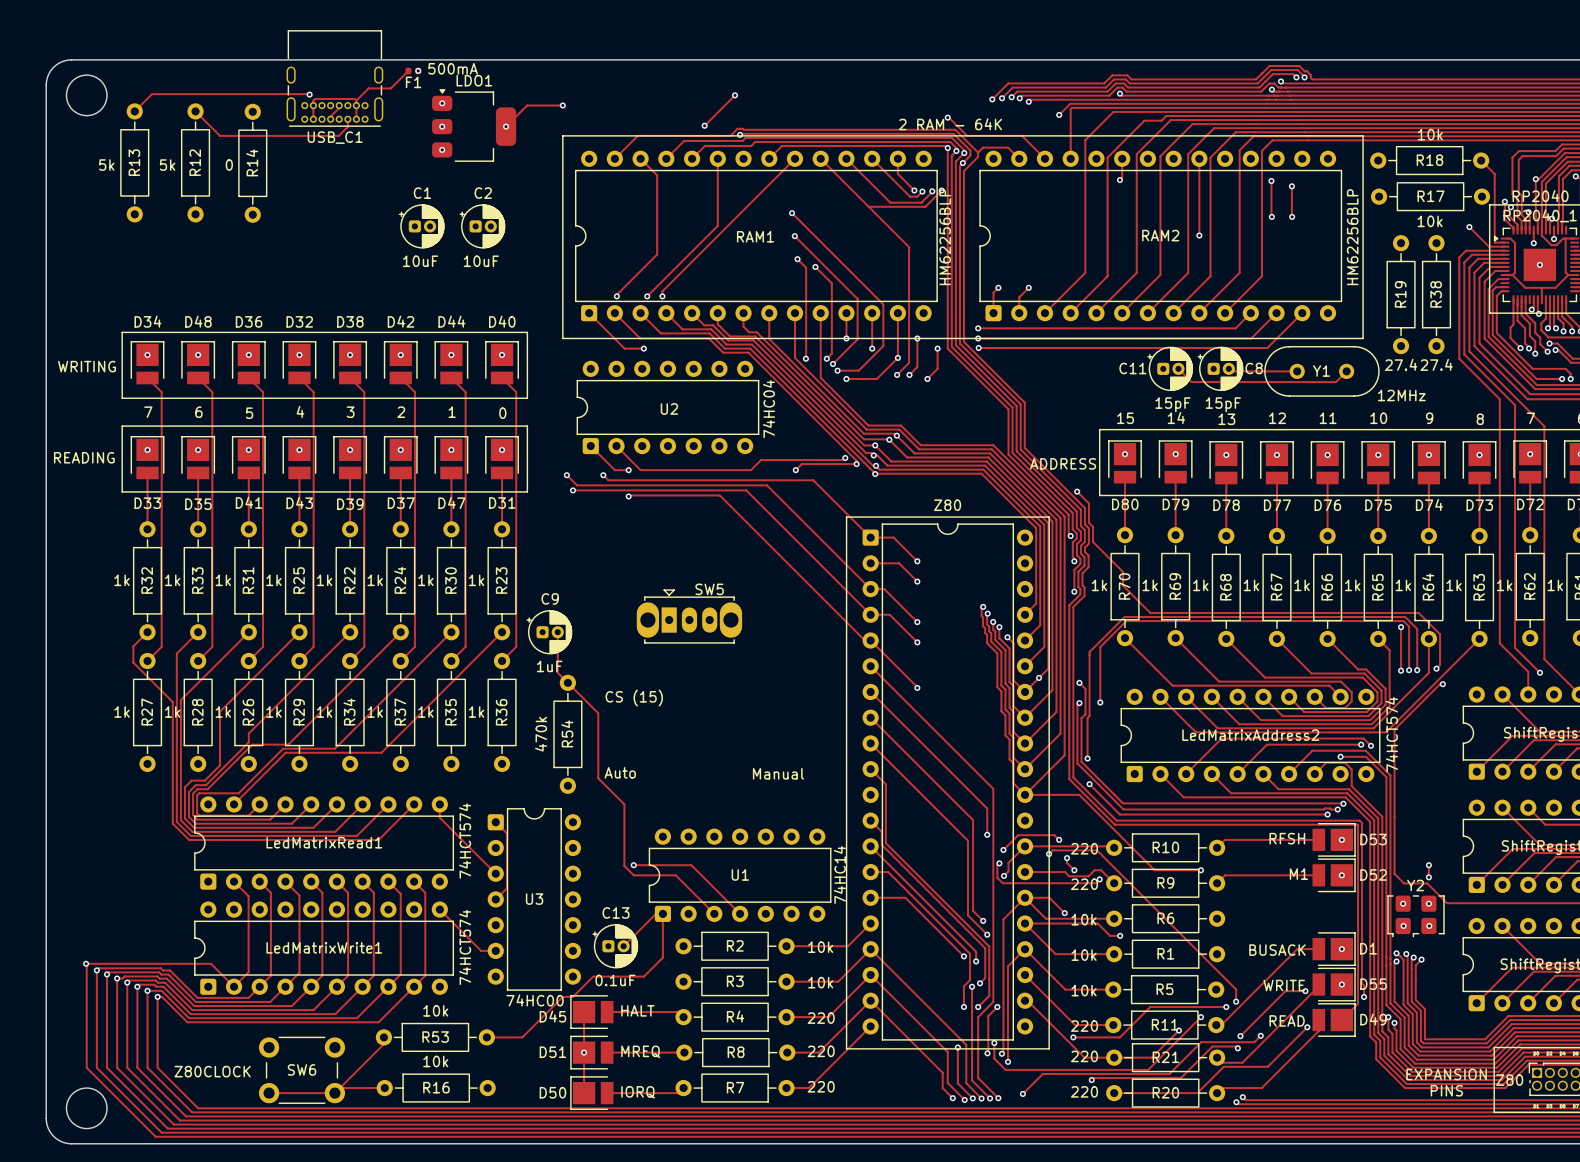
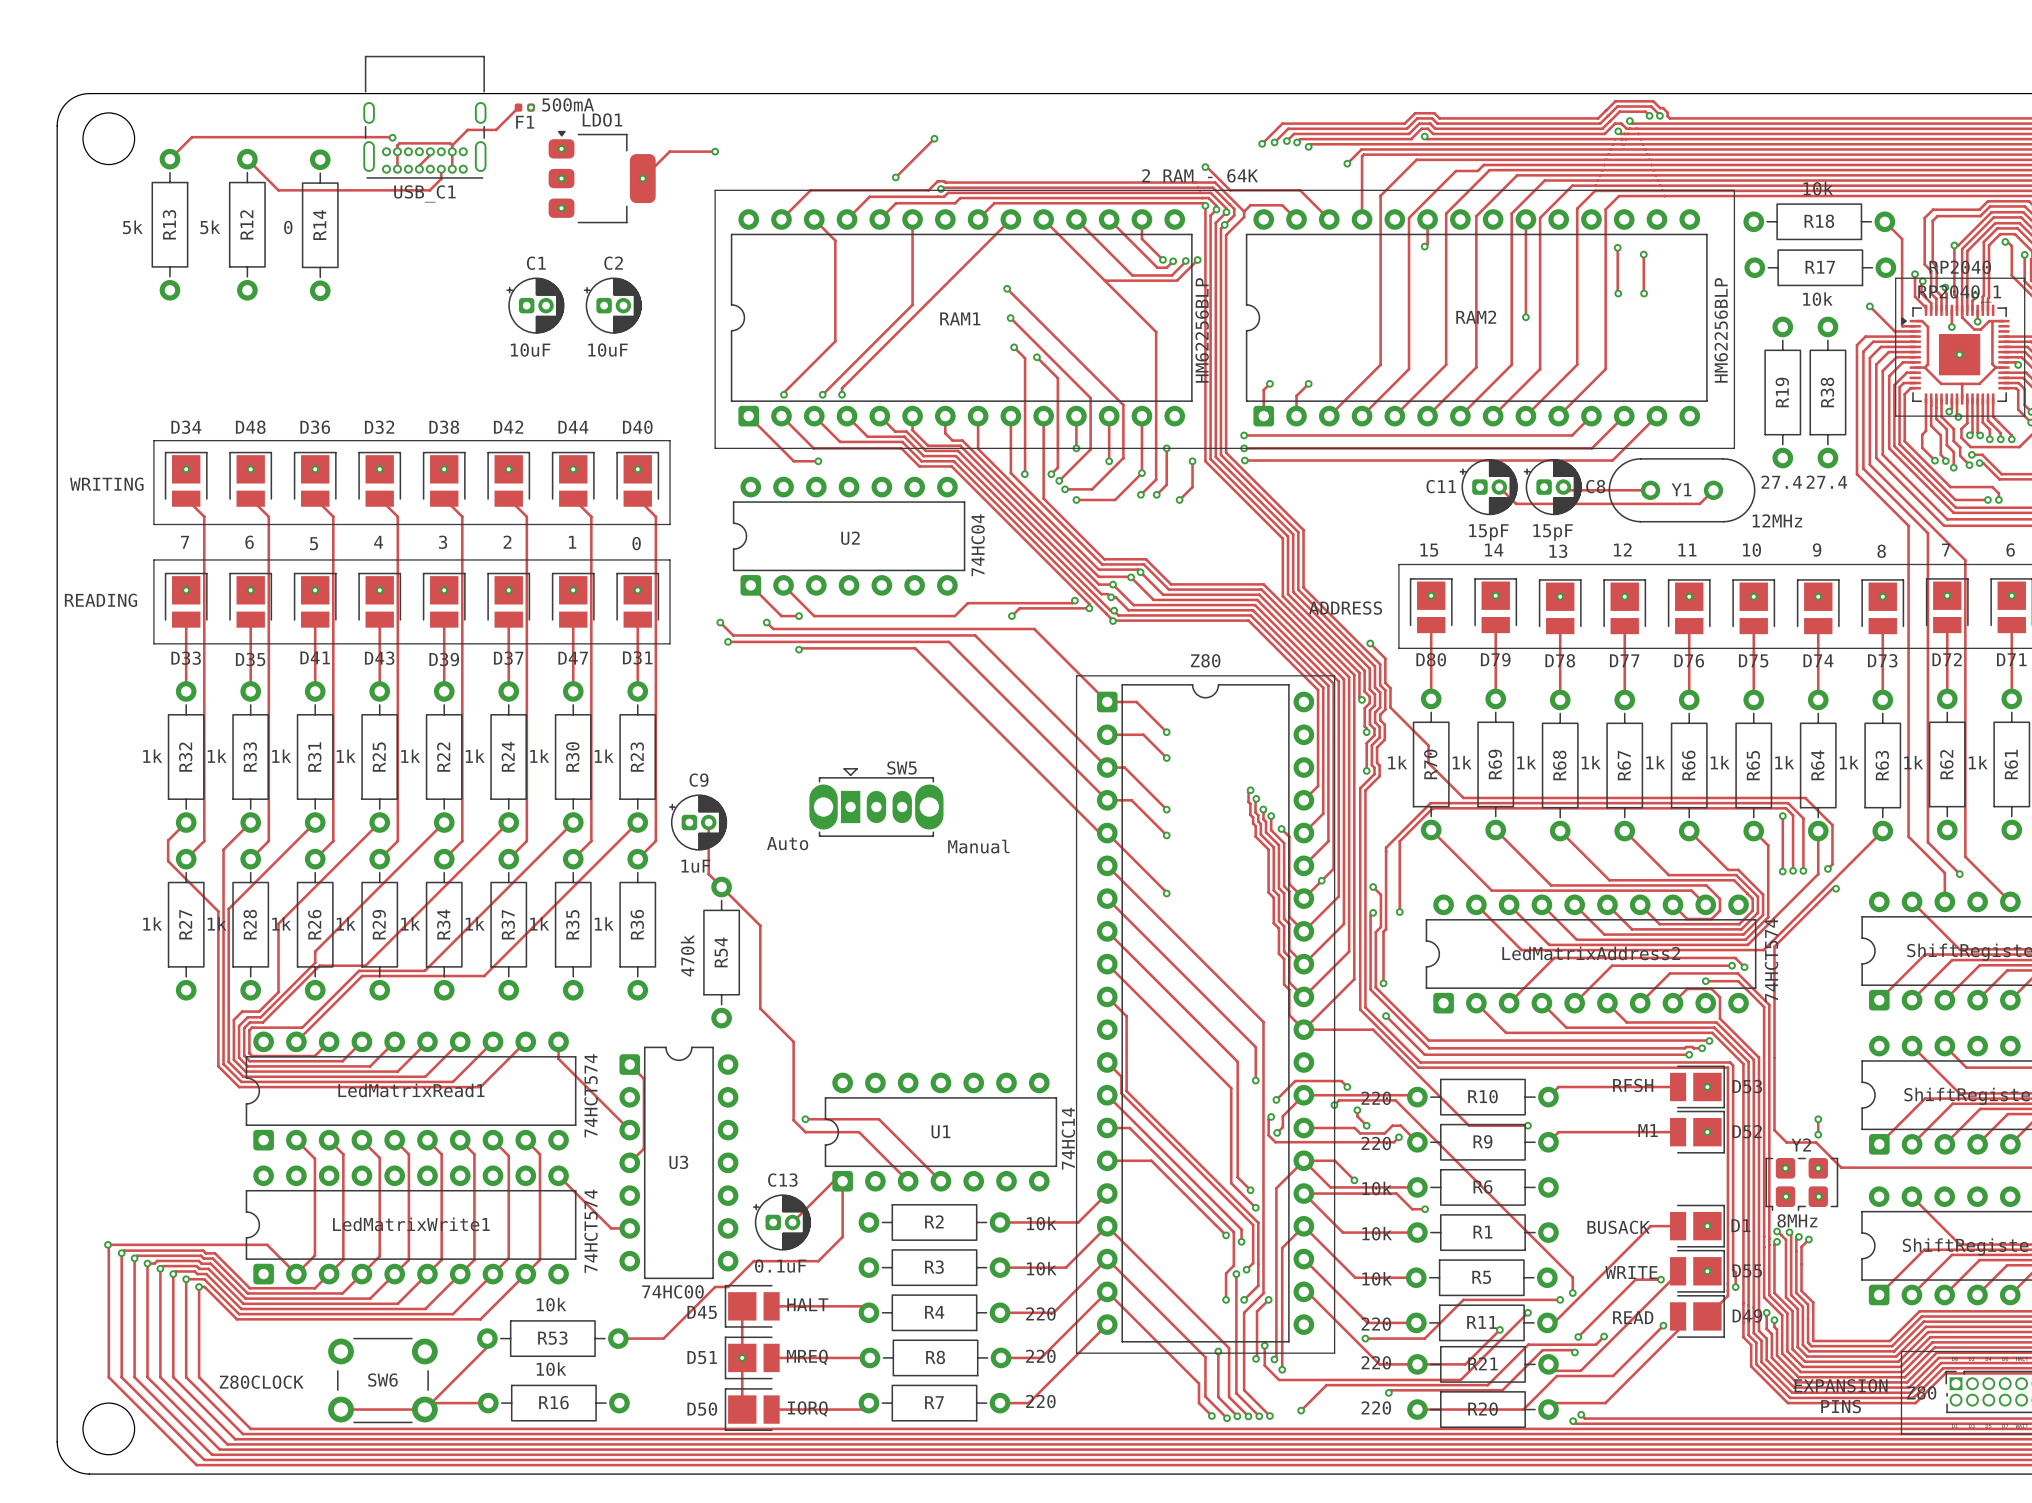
text: CS (15) (634, 698) -> none
text position: Auto (620, 772) -> Auto (787, 843)
text position: Manual (778, 773) -> Manual (978, 846)
text: none -> 8MHz (1797, 1220)

